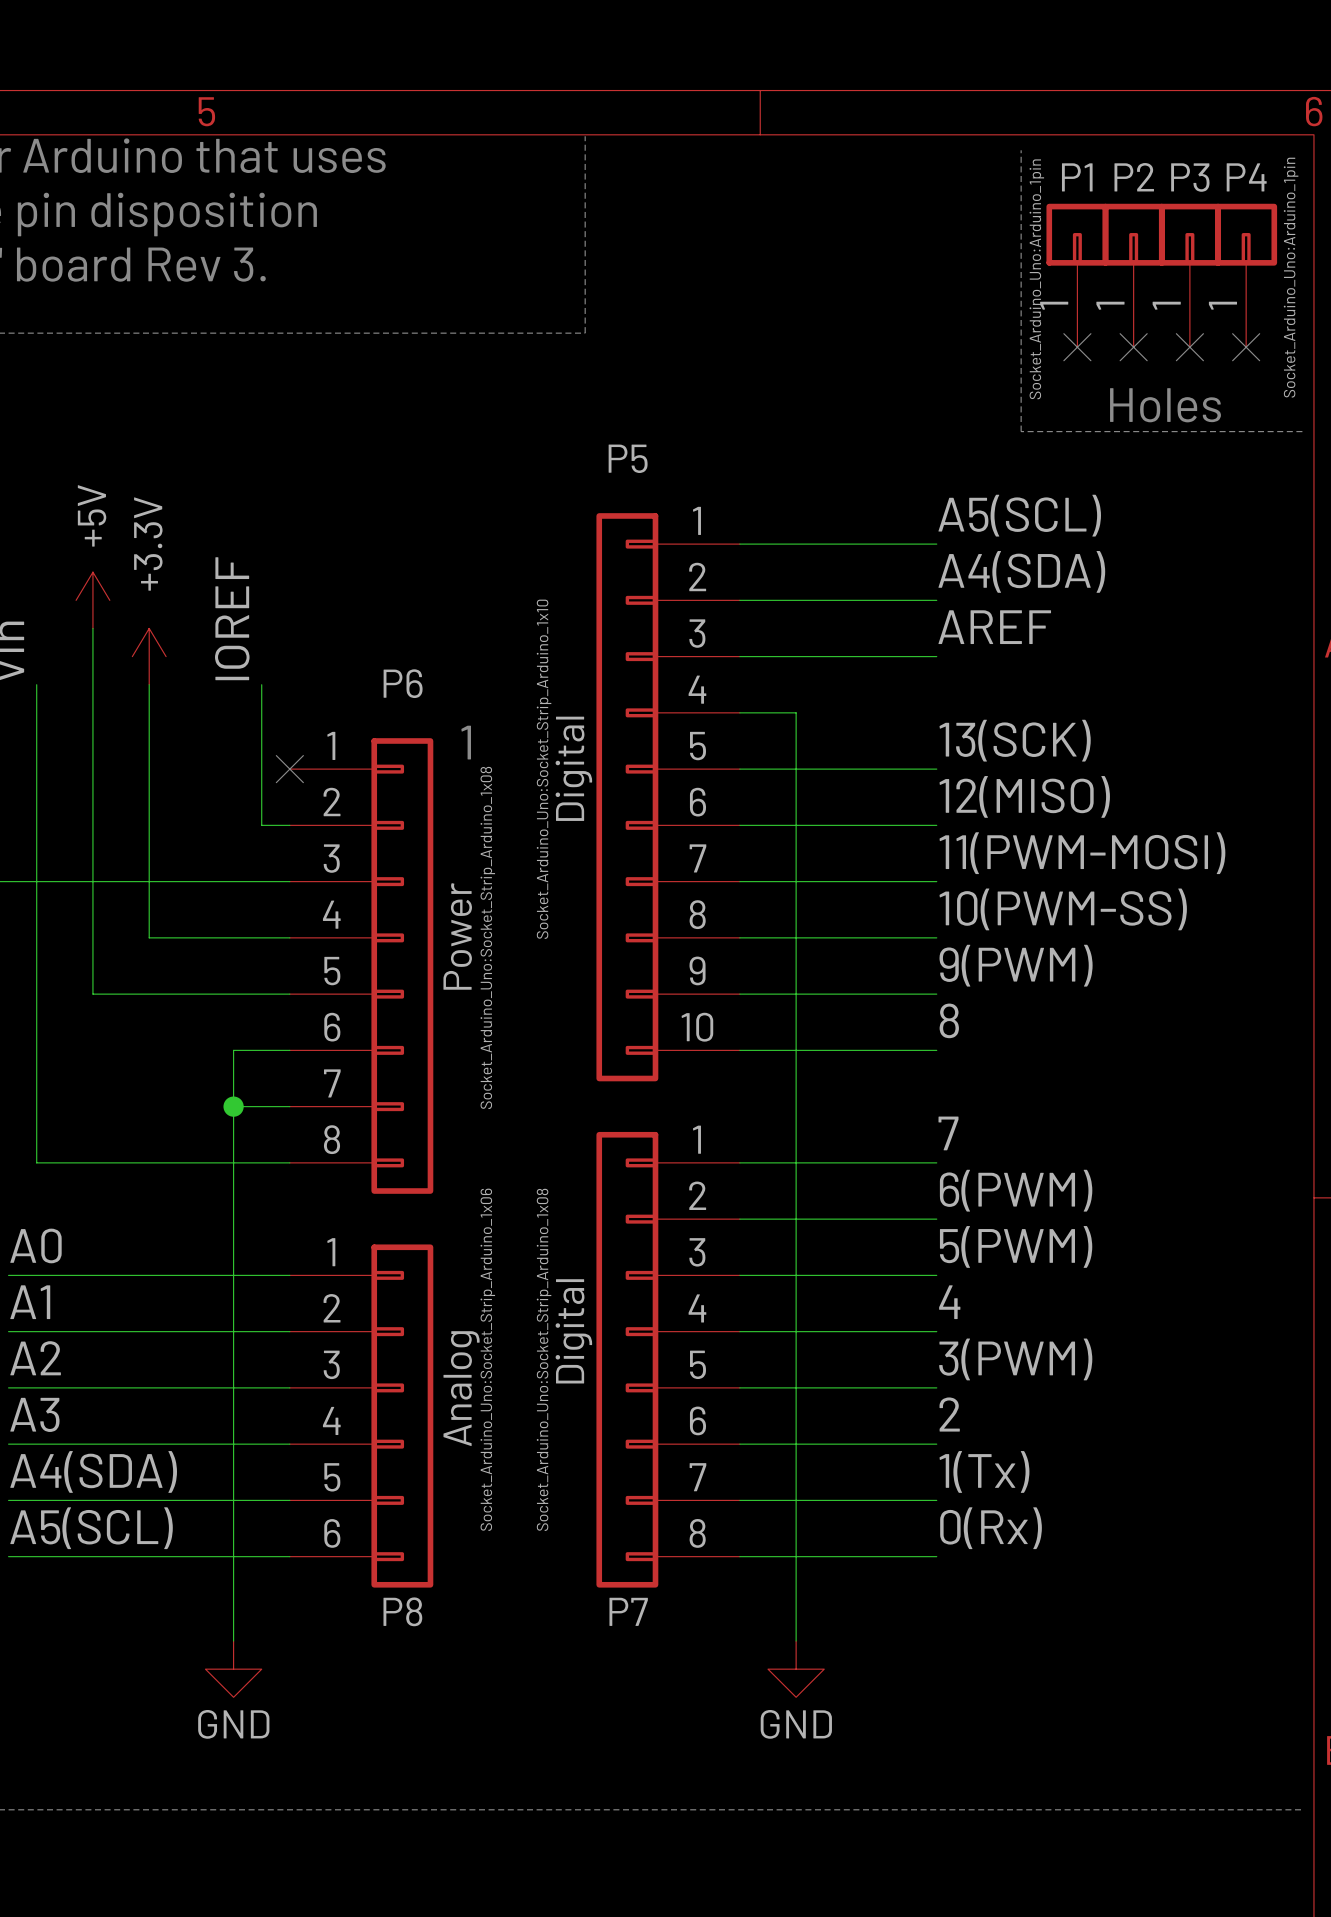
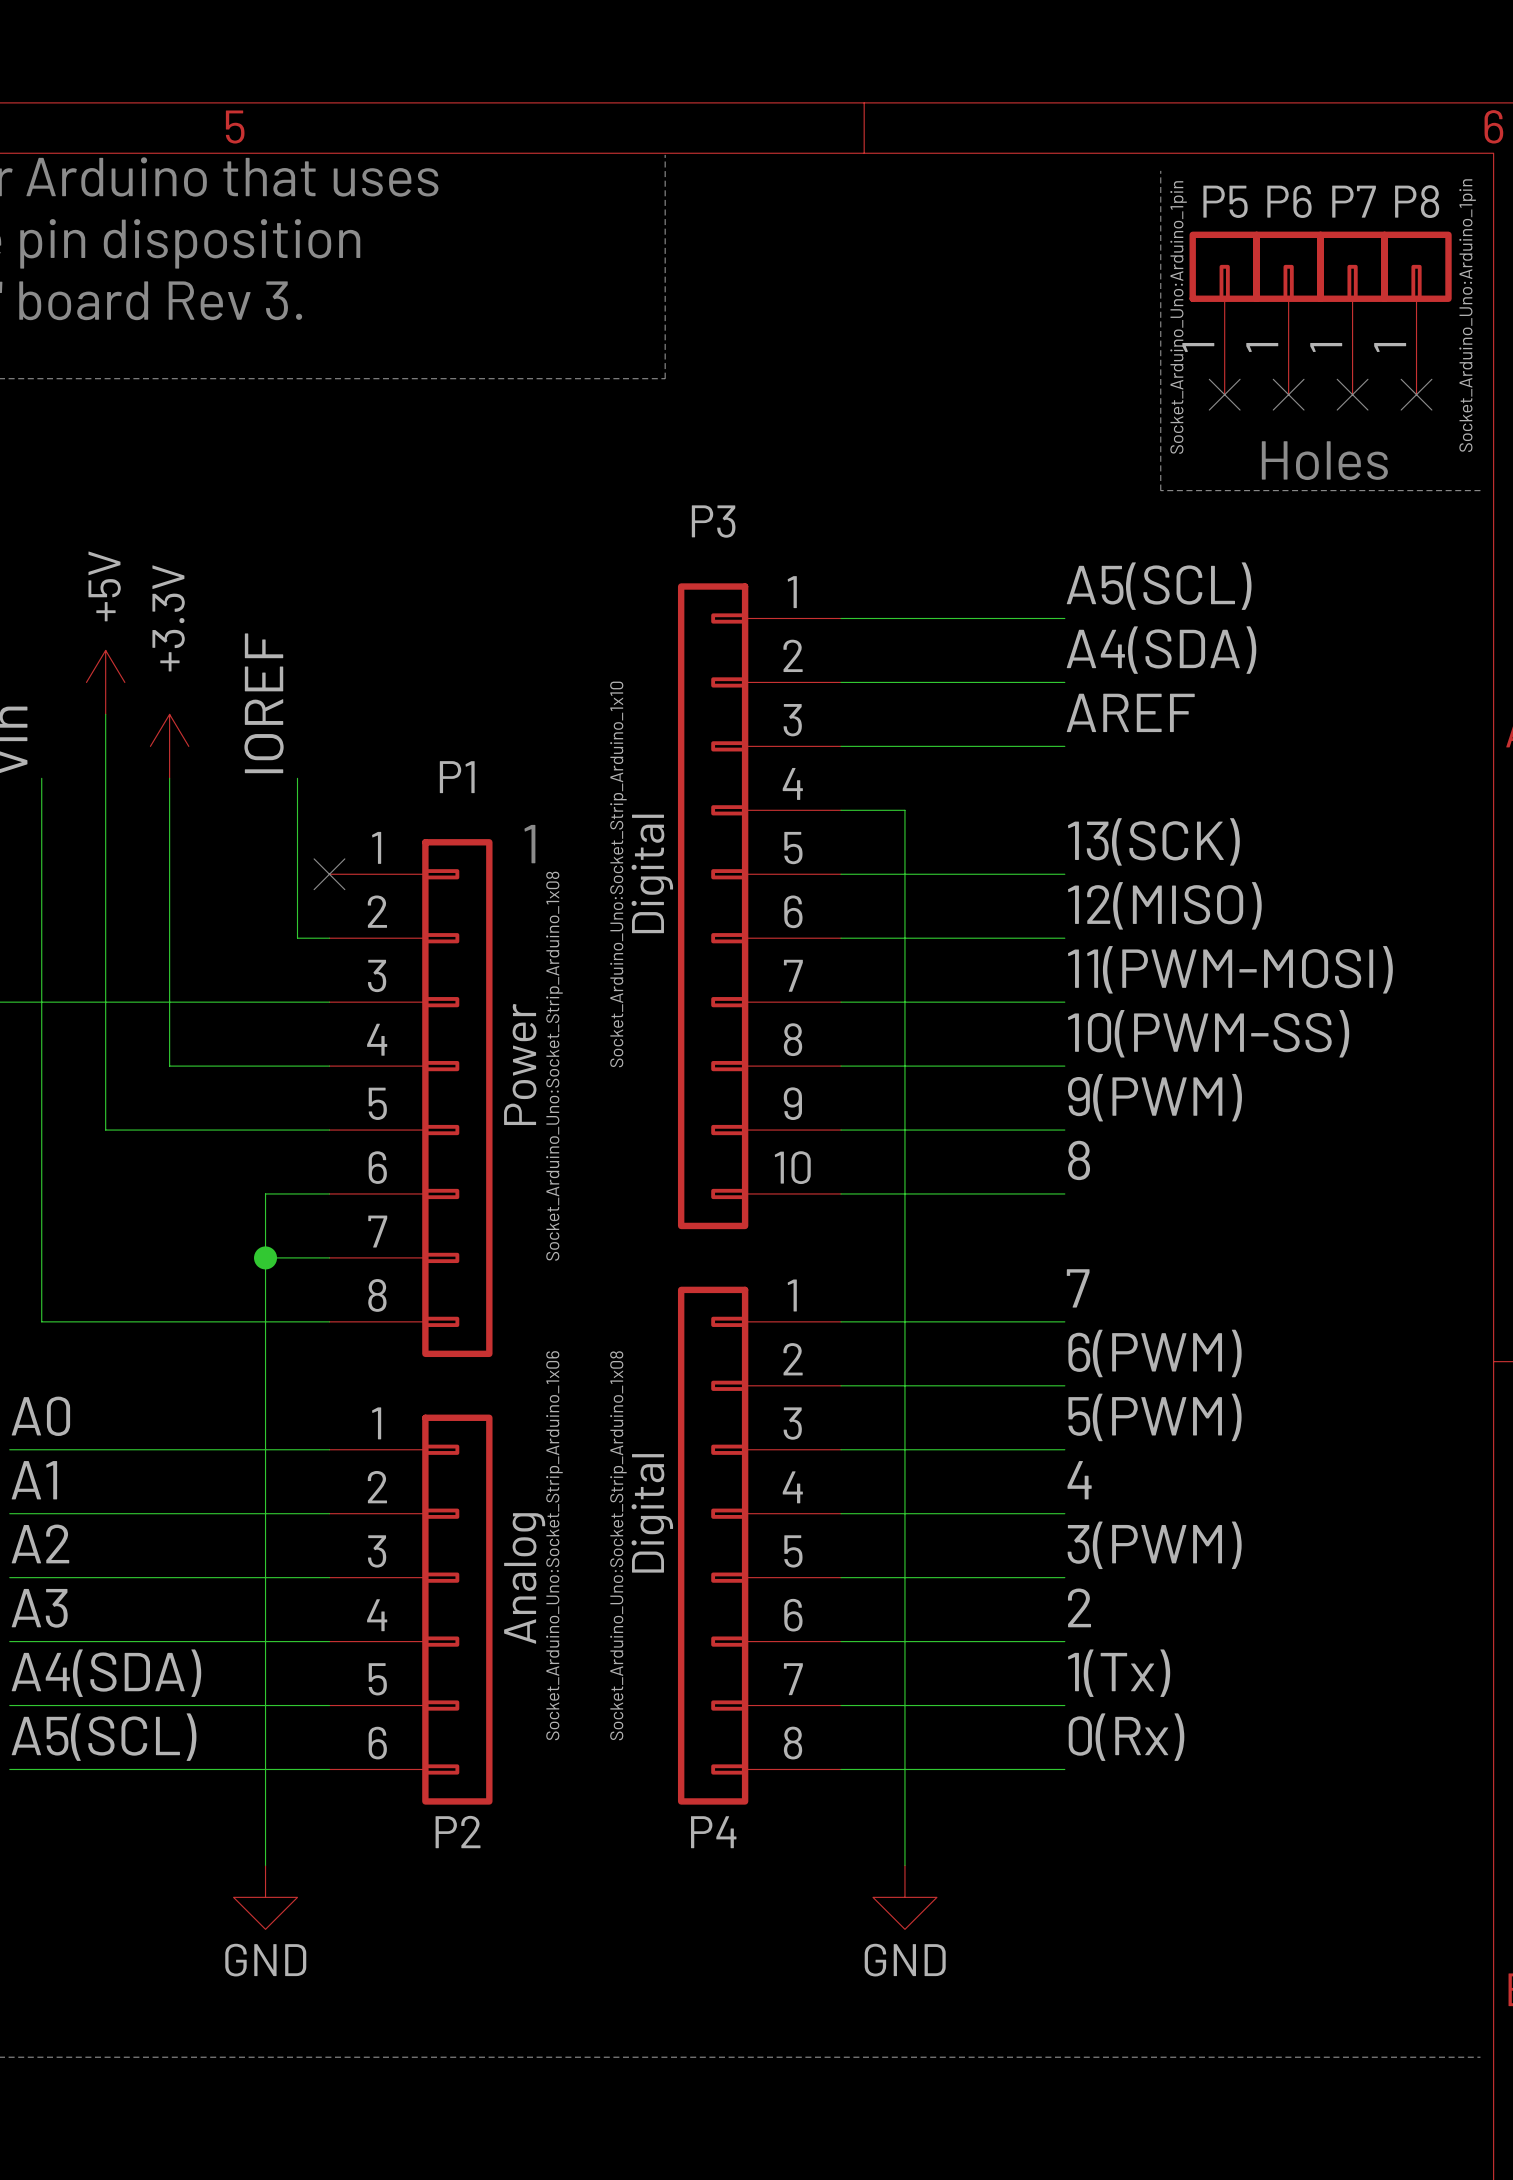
P1 name: P1 (1077, 177) -> P5 (1225, 201)
P2 name: P2 (1134, 177) -> P6 (1289, 201)
P3 name: P3 (1190, 177) -> P7 (1354, 201)
P4 name: P4 (1246, 177) -> P8 (1417, 201)
P5 name: P5 (628, 458) -> P3 (713, 521)
P6 name: P6 (403, 683) -> P1 (457, 777)
P8 name: P8 (402, 1611) -> P2 (458, 1832)
P7 name: P7 (628, 1611) -> P4 (713, 1832)

